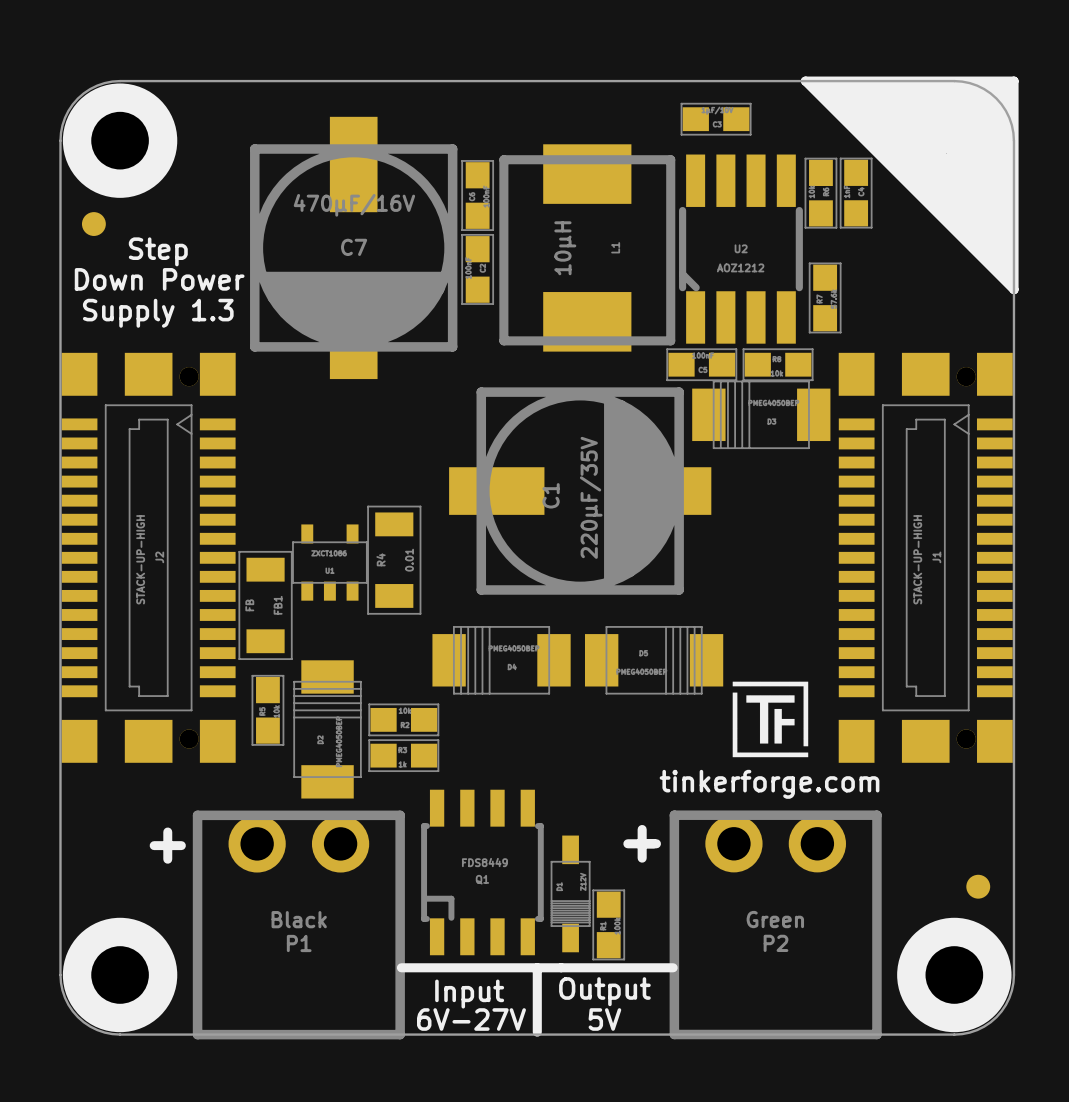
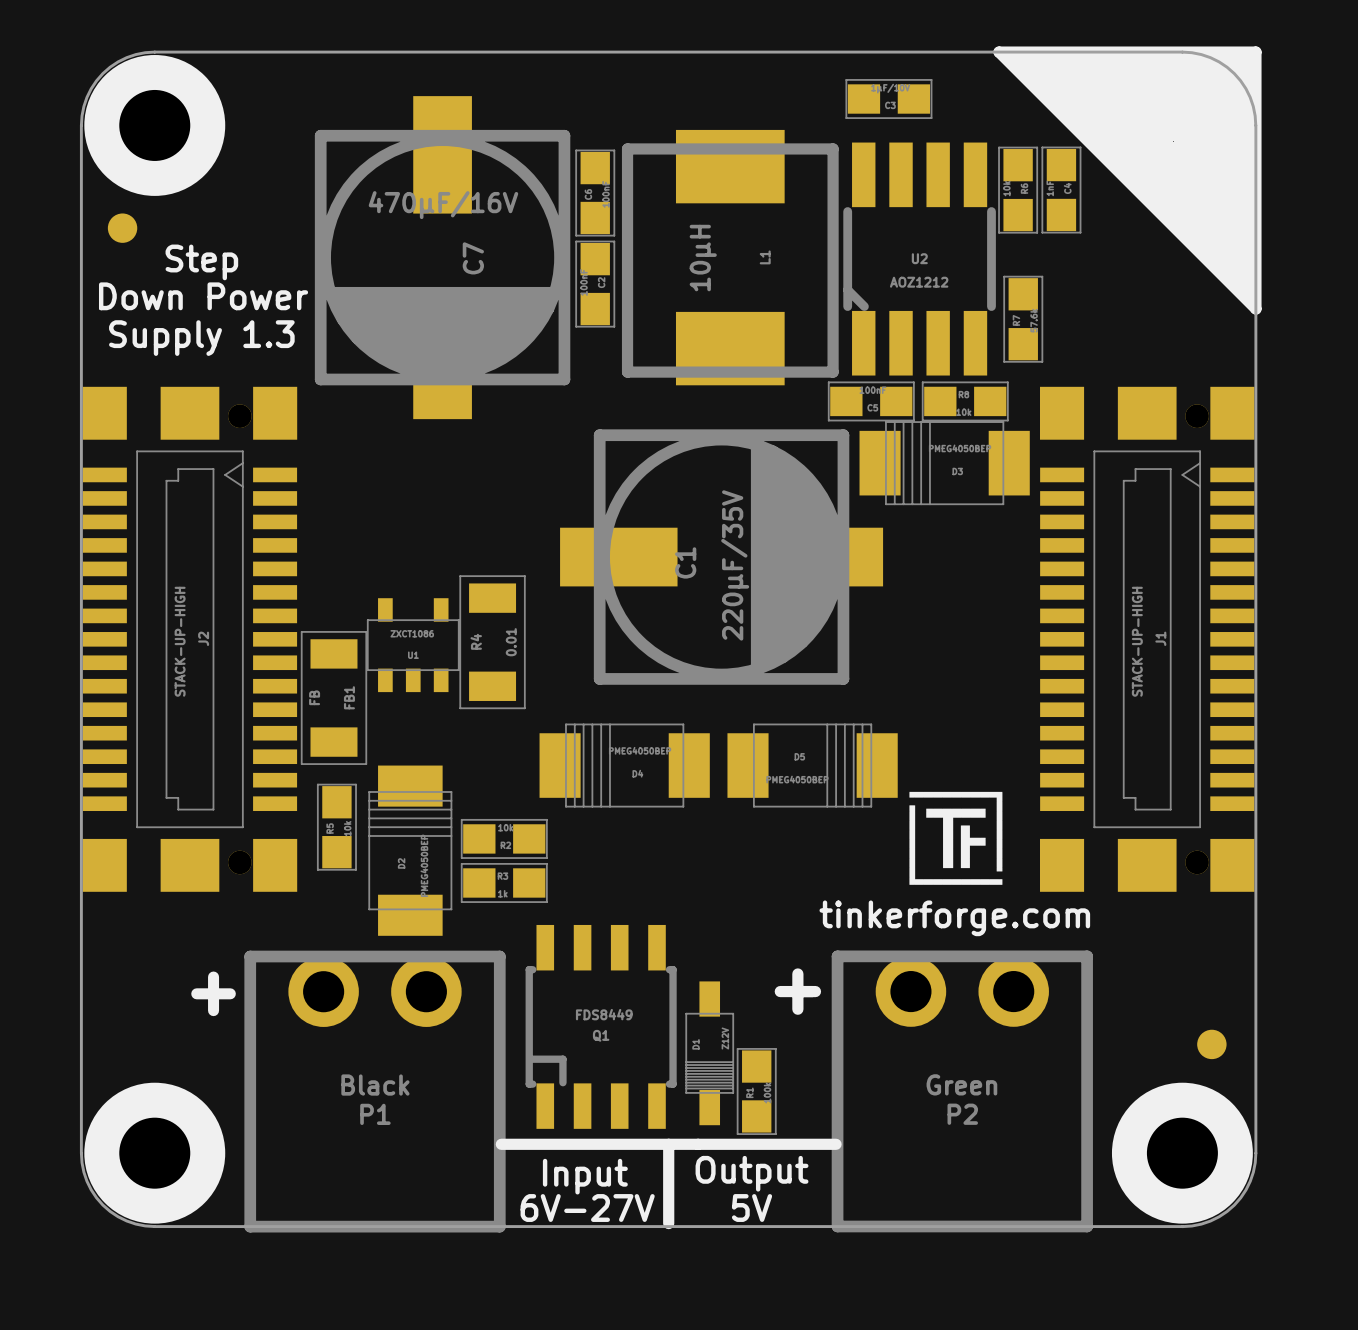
C7 name rotation: 0° (354, 247) -> 90° counterclockwise (473, 258)

